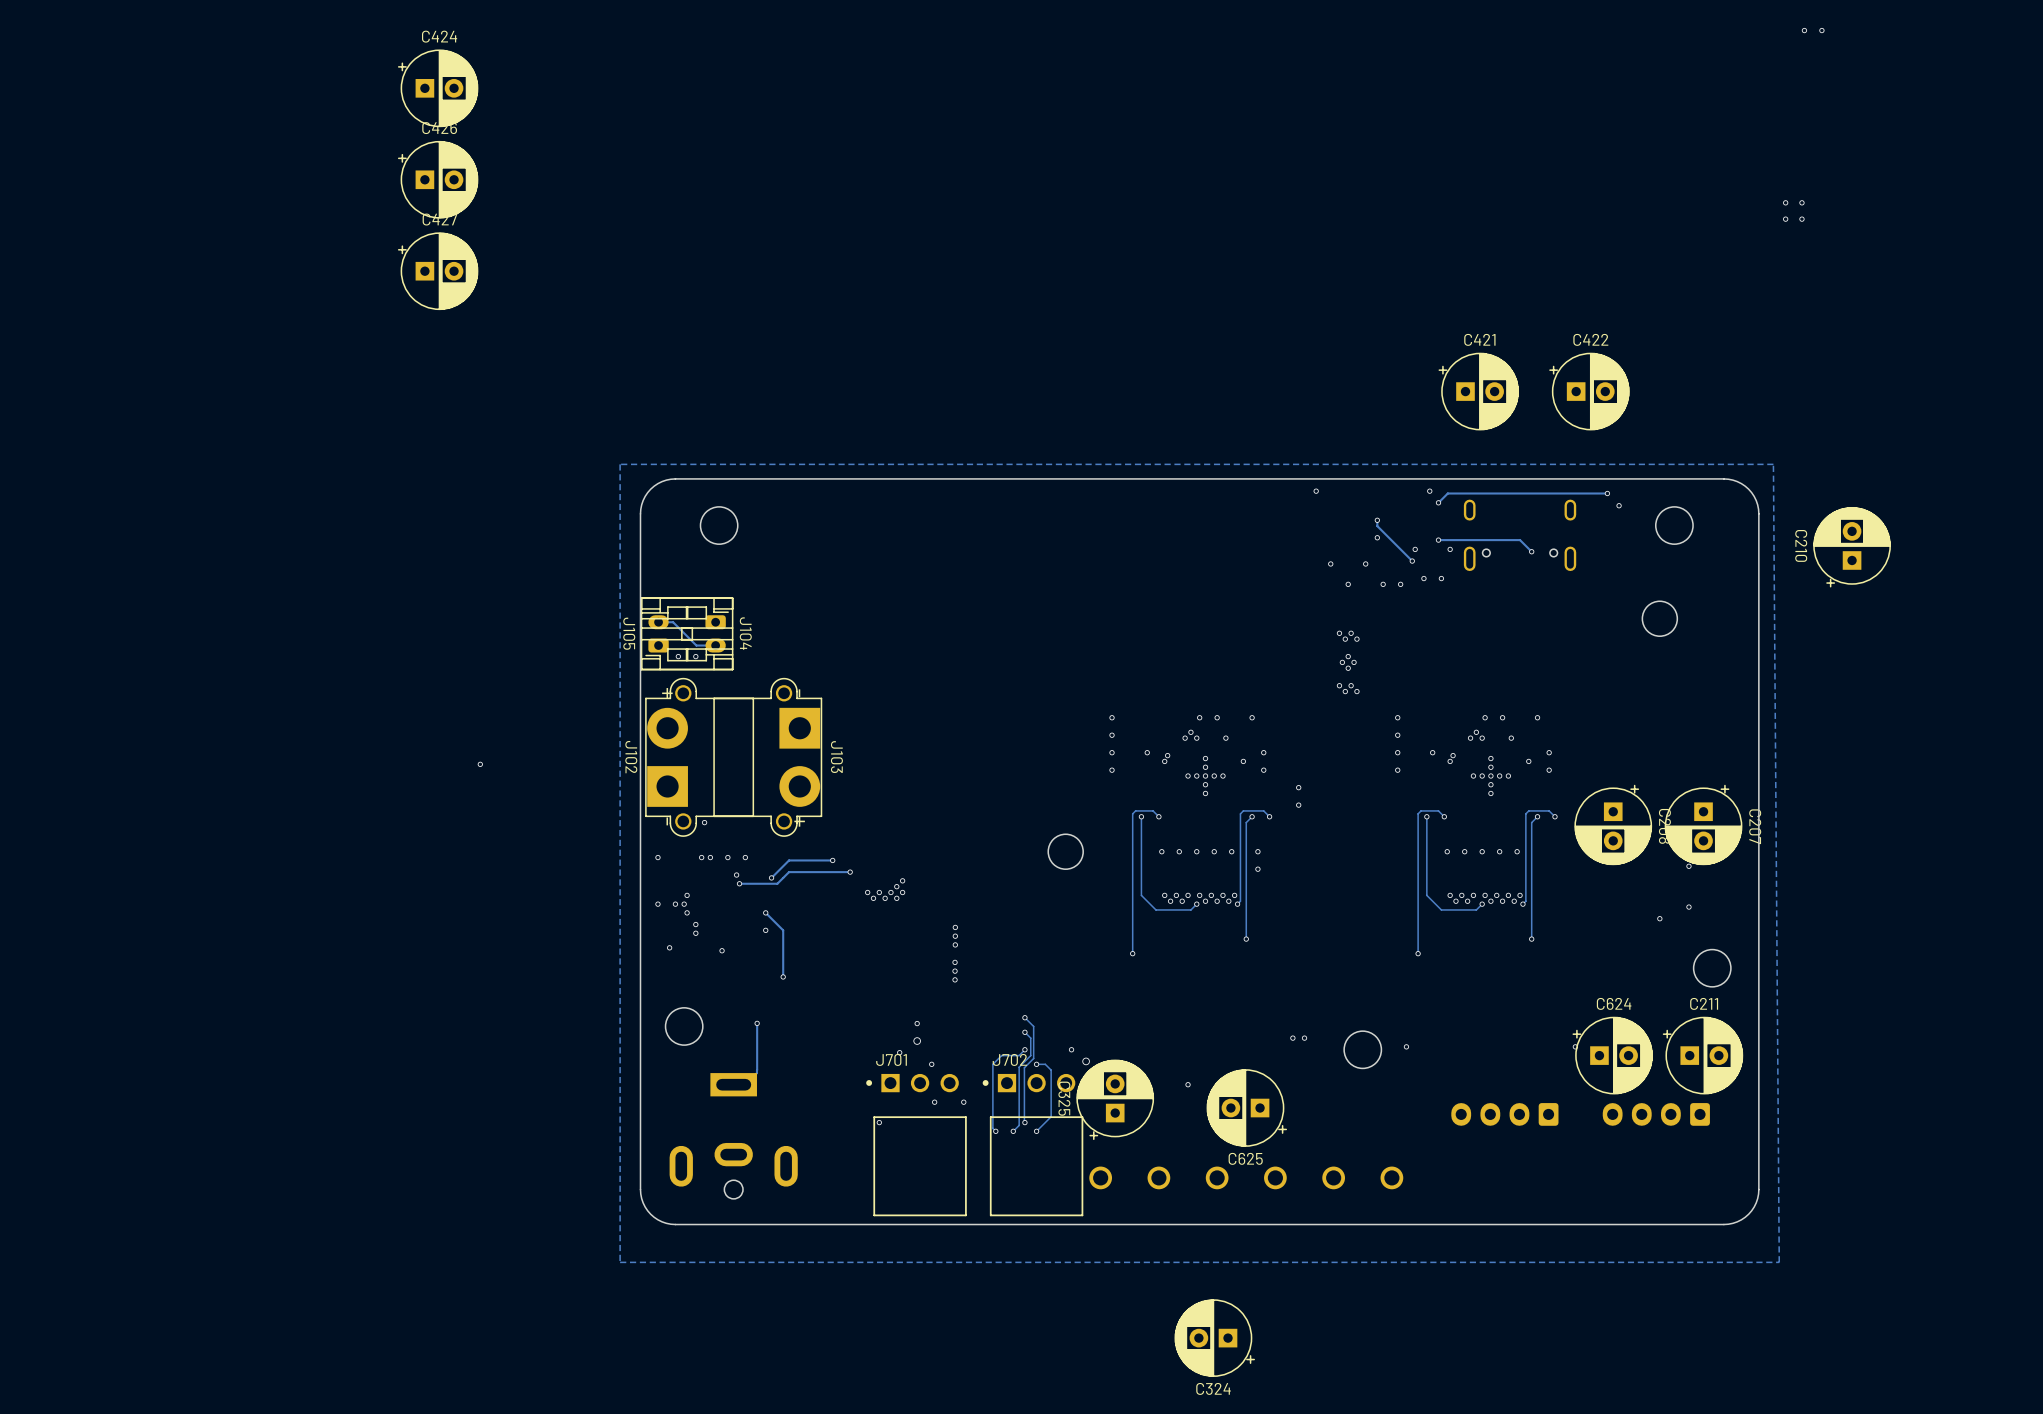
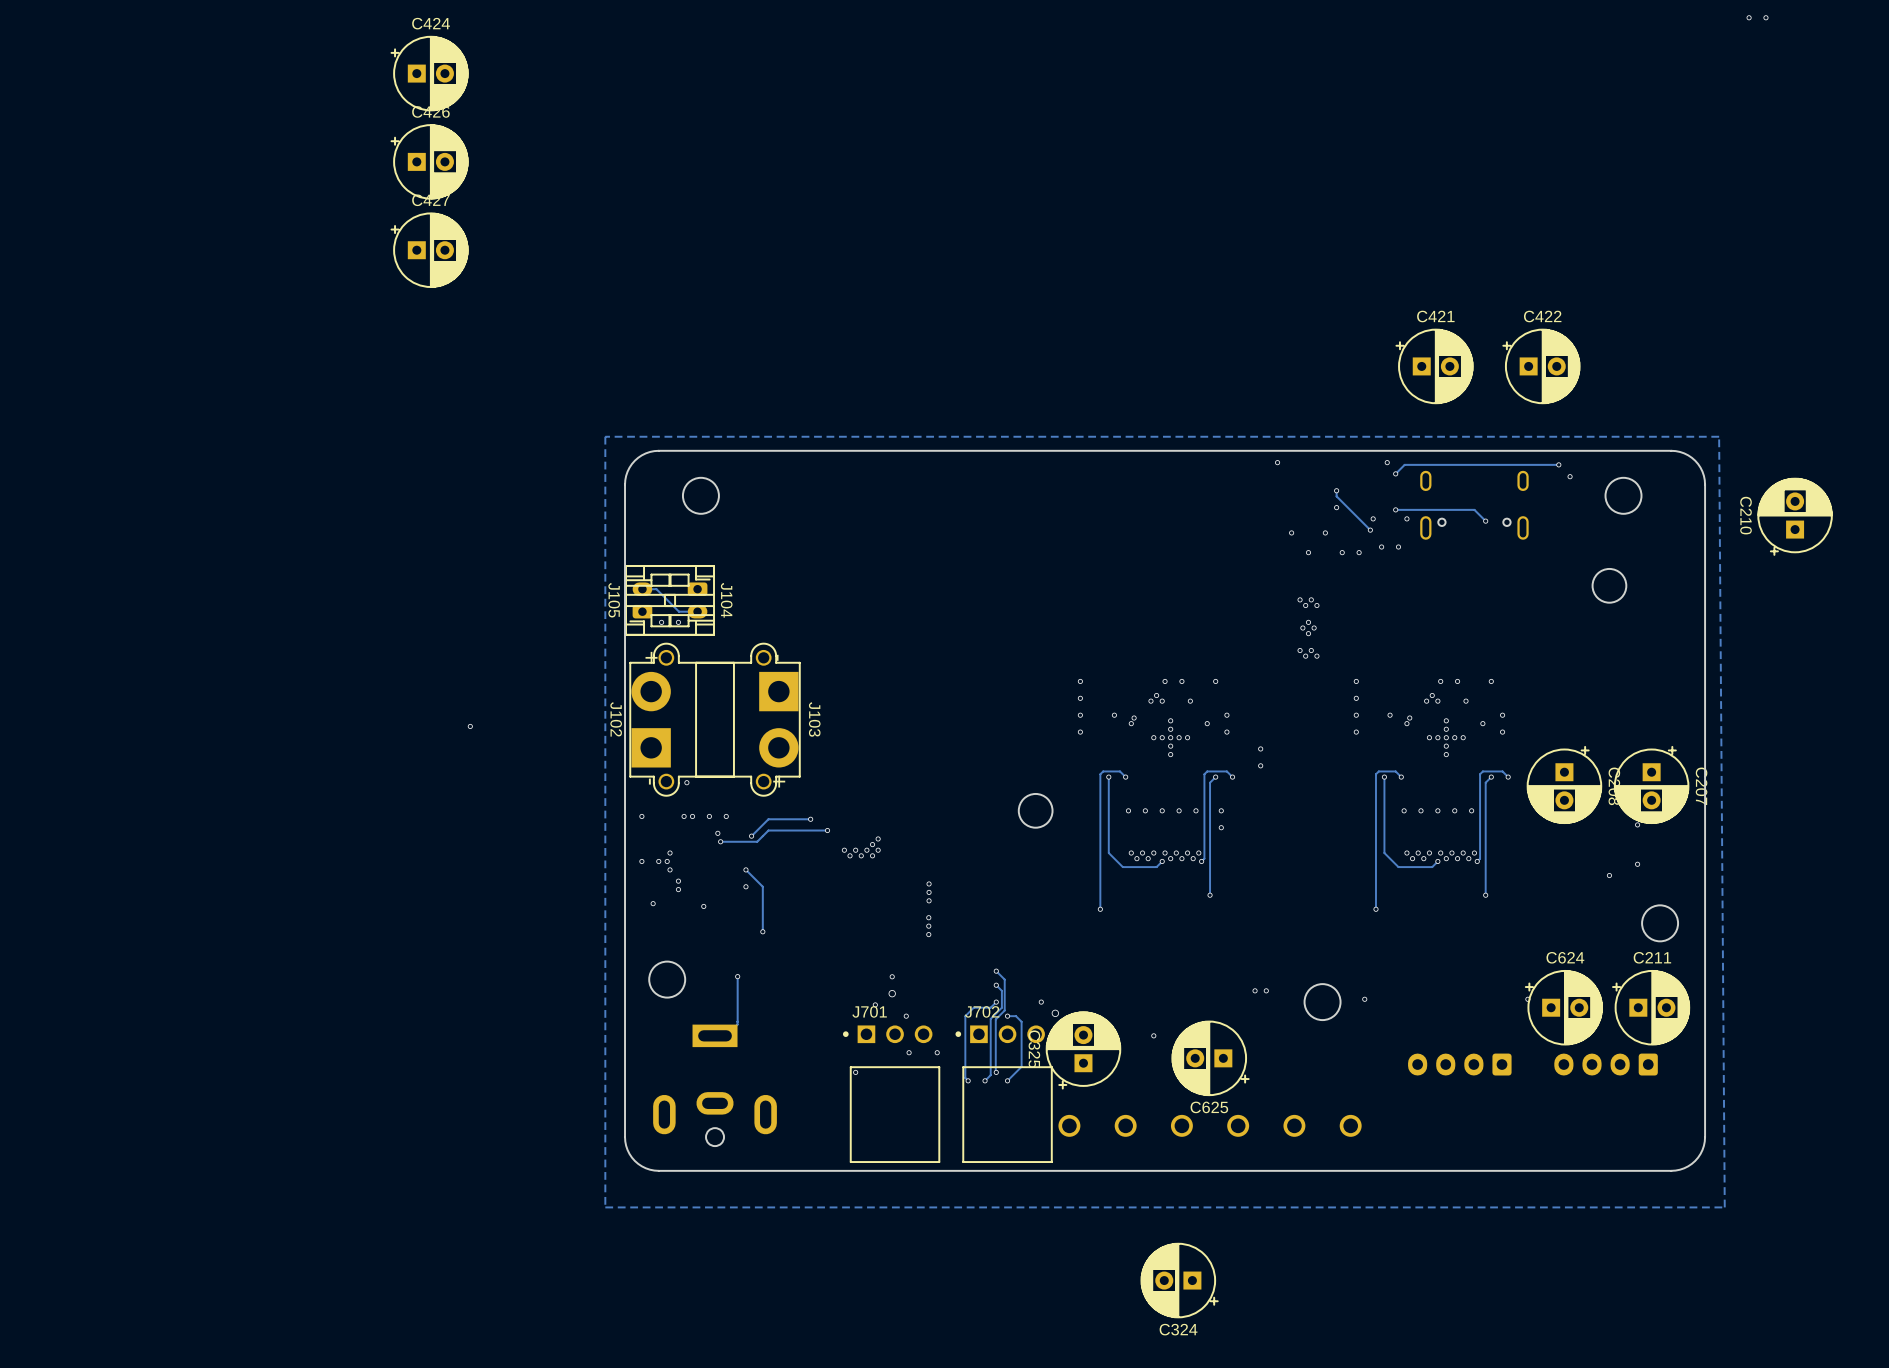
via: (1785, 202) -> none
via: (1801, 202) -> none
via: (1785, 219) -> none
via: (1801, 219) -> none

